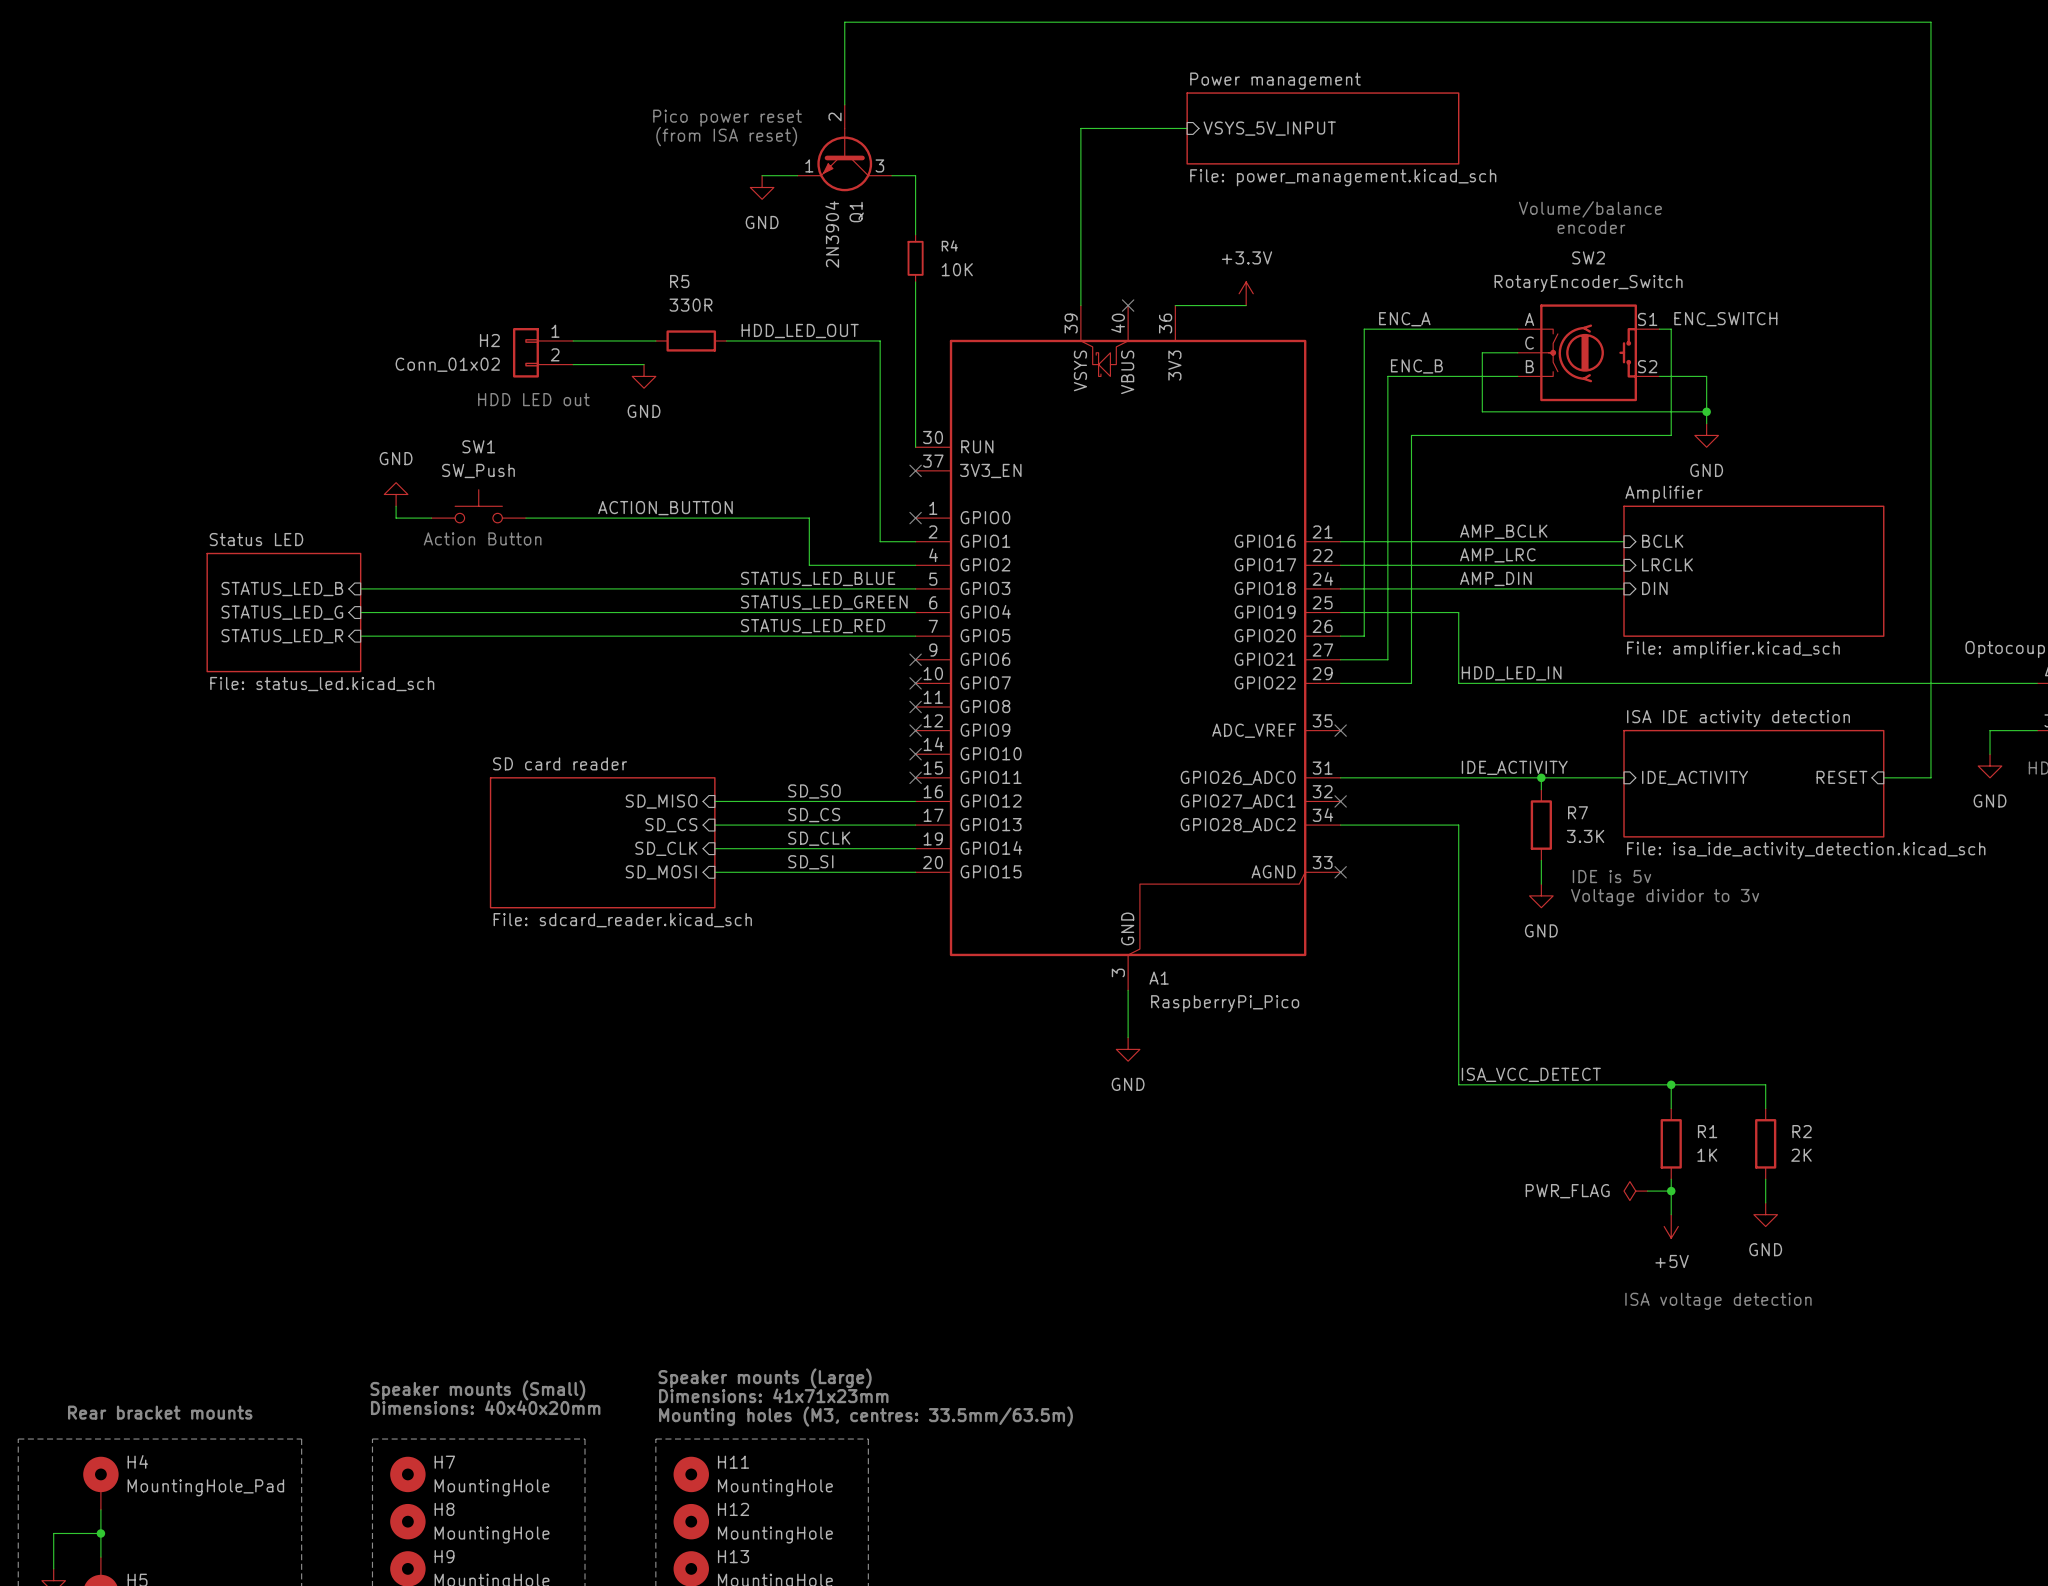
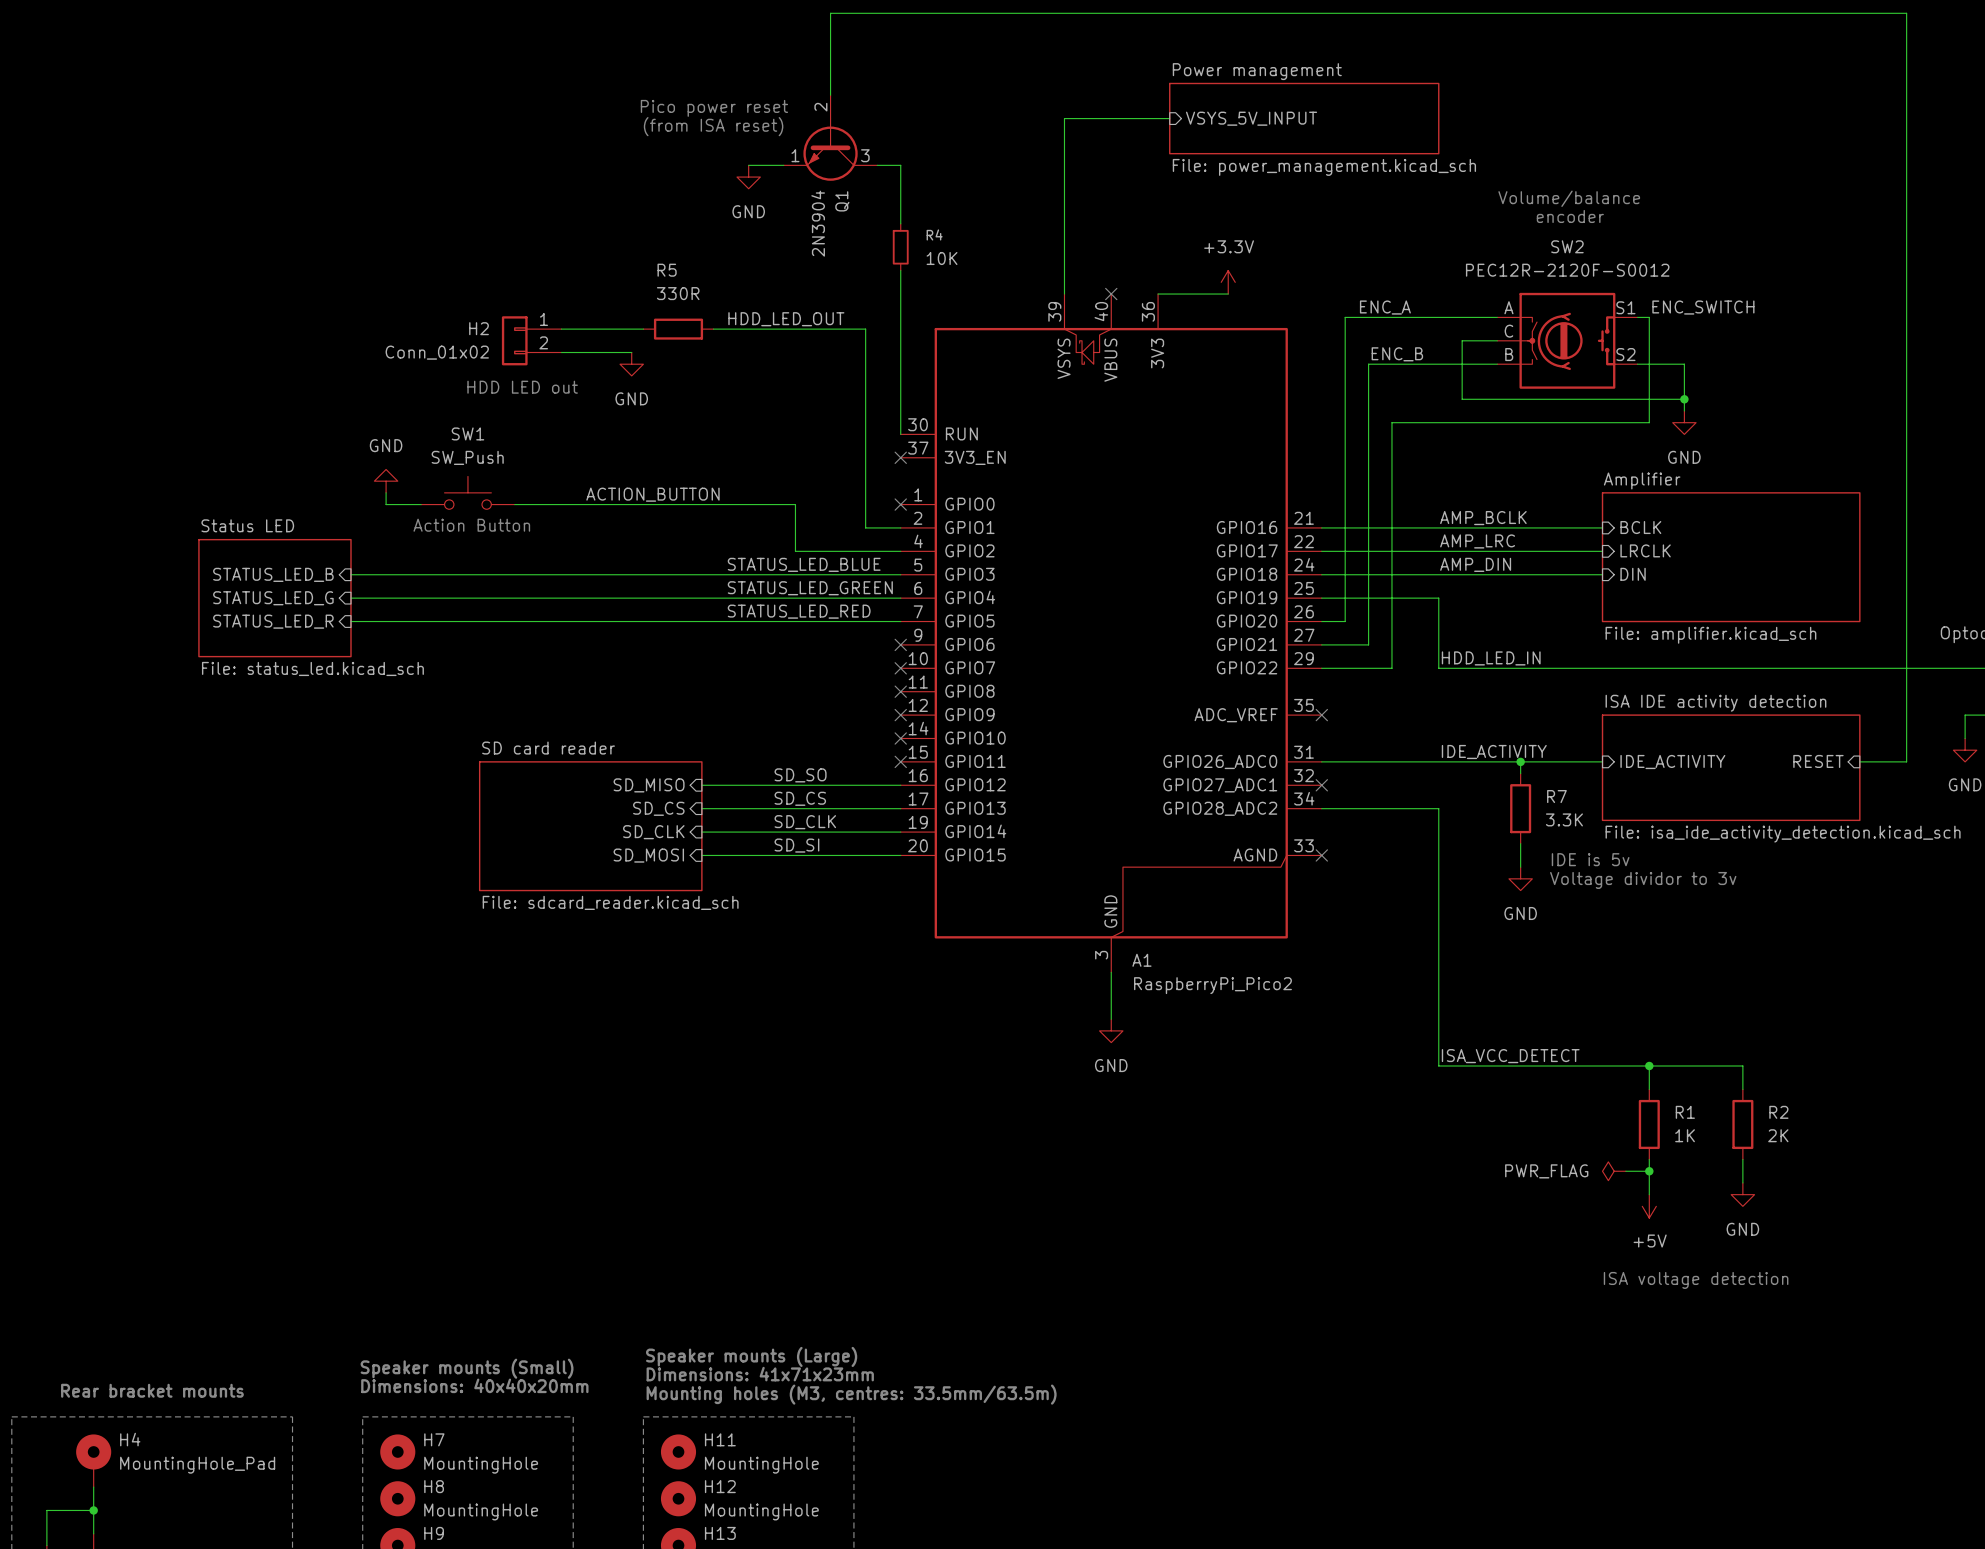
SW2 value: RotaryEncoder_Switch (1588, 283) -> PEC12R-2120F-S0012 (1567, 270)
A1 value: RaspberryPi_Pico (1225, 1003) -> RaspberryPi_Pico2 (1212, 985)

